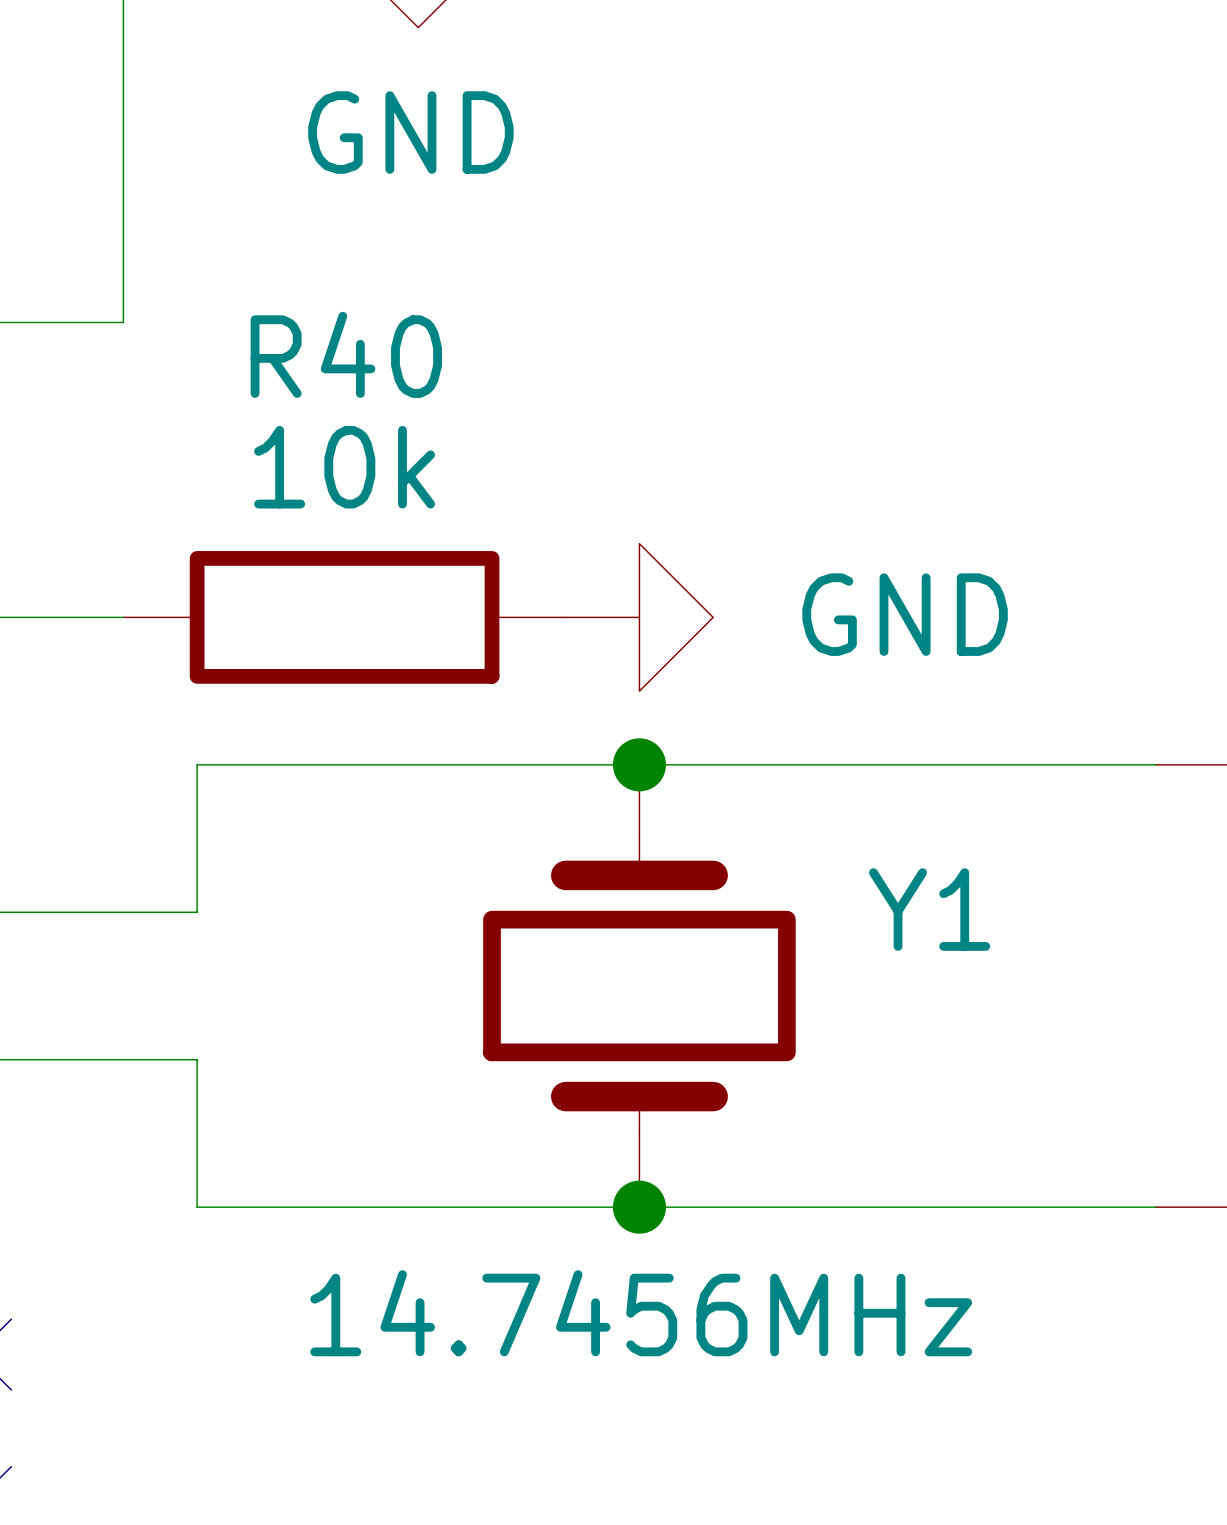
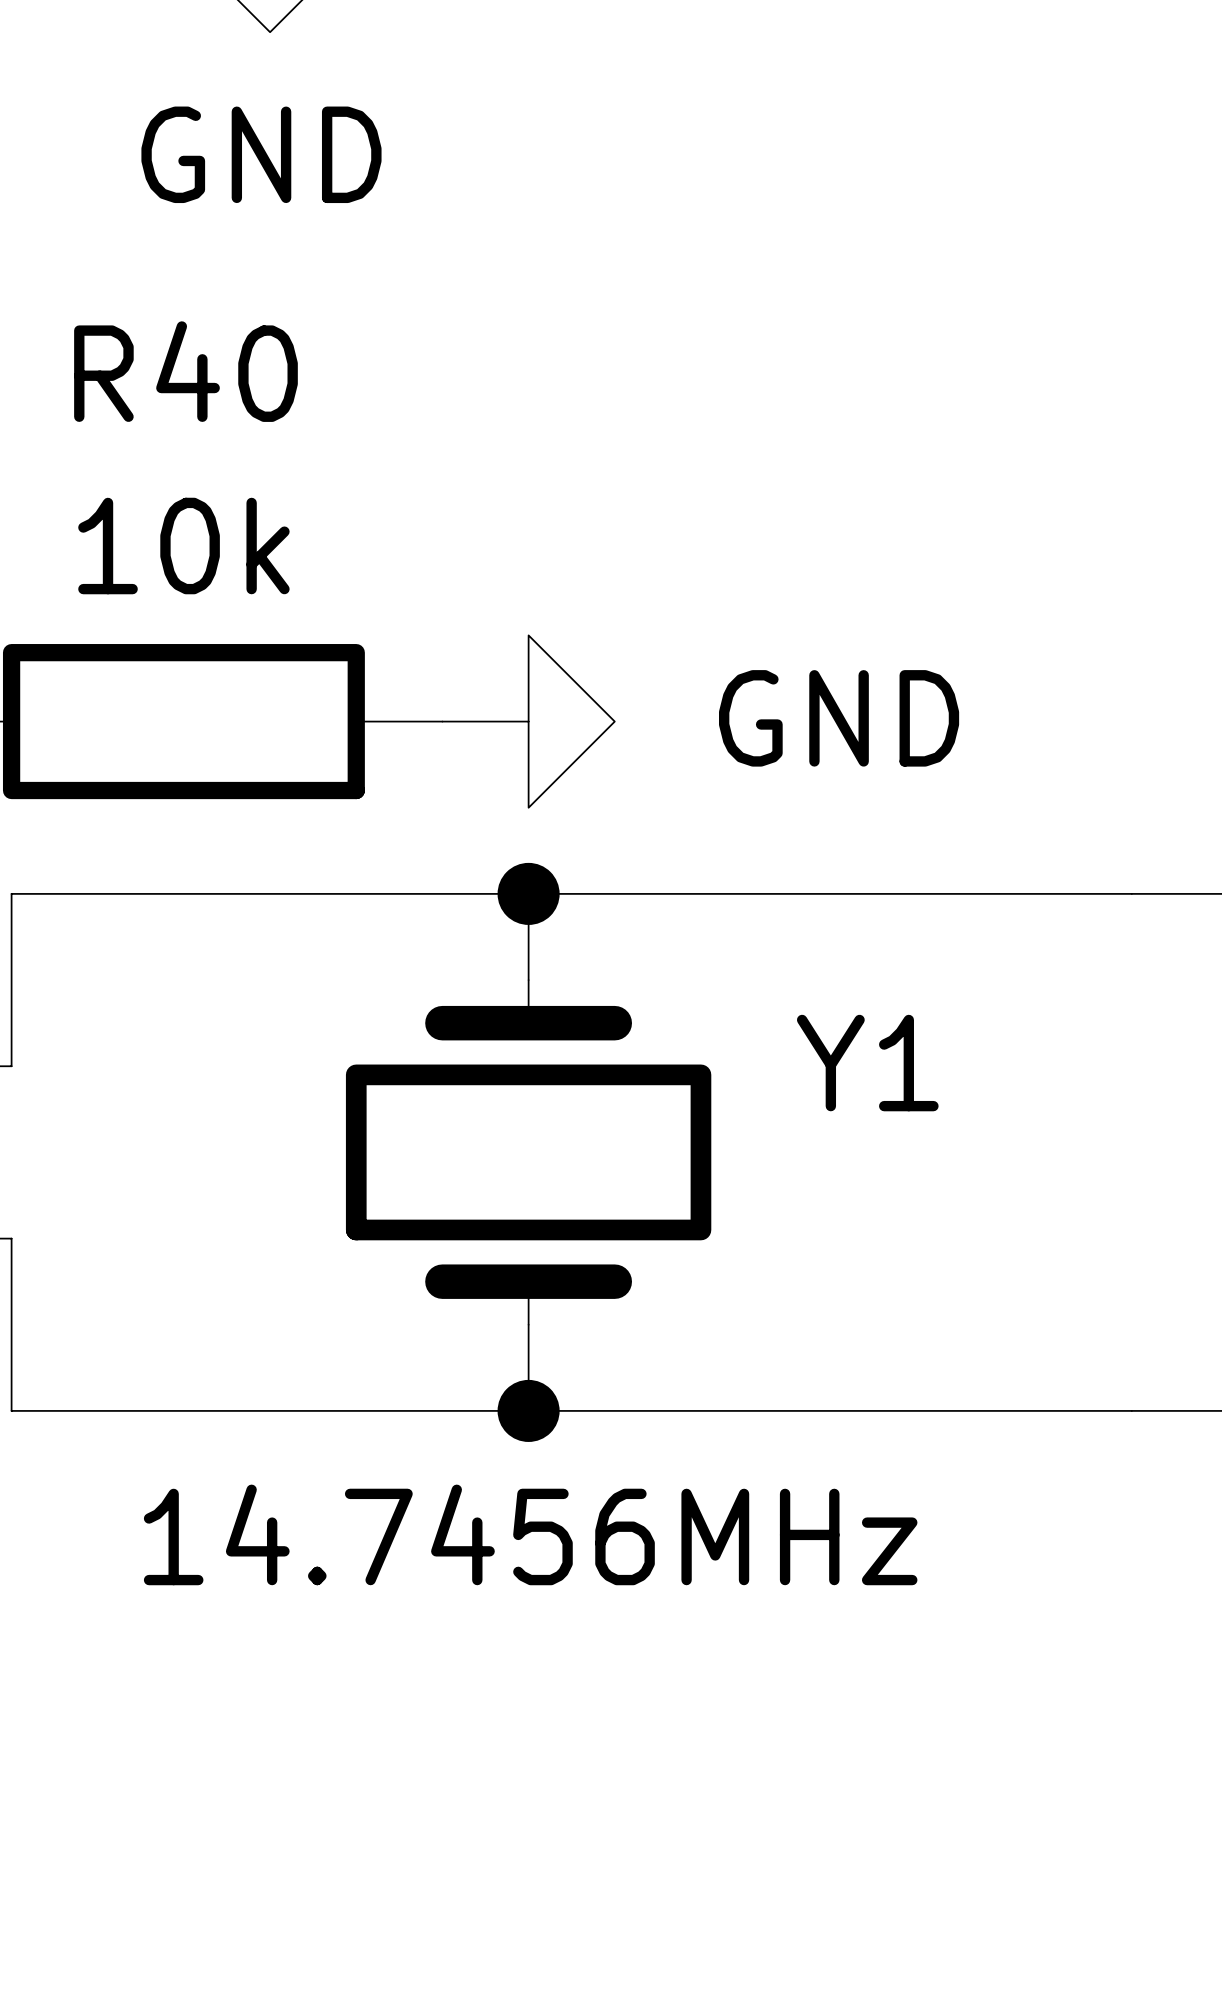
R40 name position: R40 (346, 354) -> R40 (185, 371)

